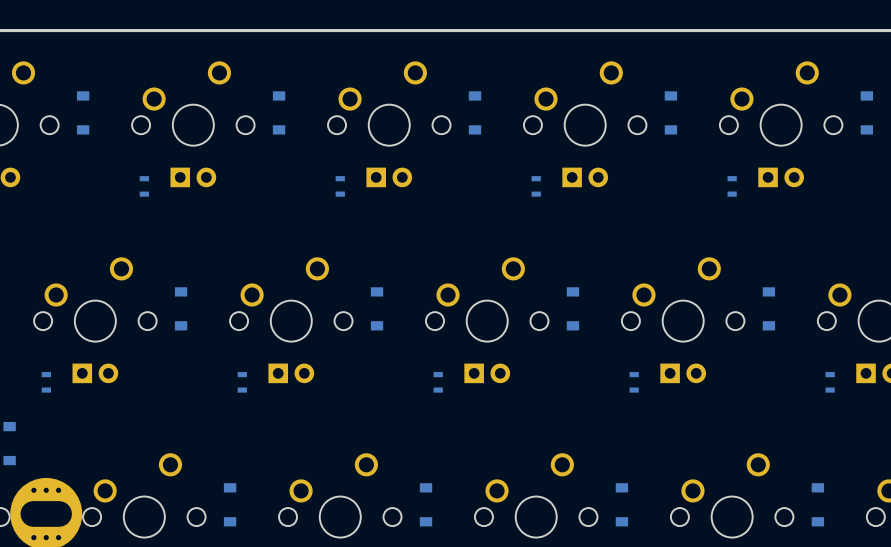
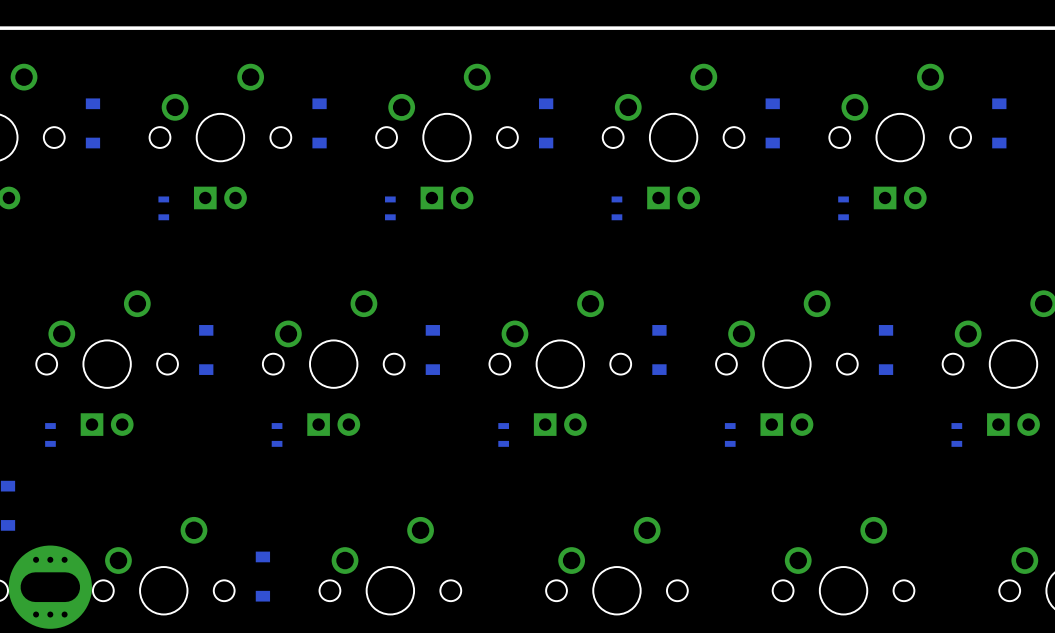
part: (426, 504) -> none
part: (621, 504) -> none
part: (817, 504) -> none

